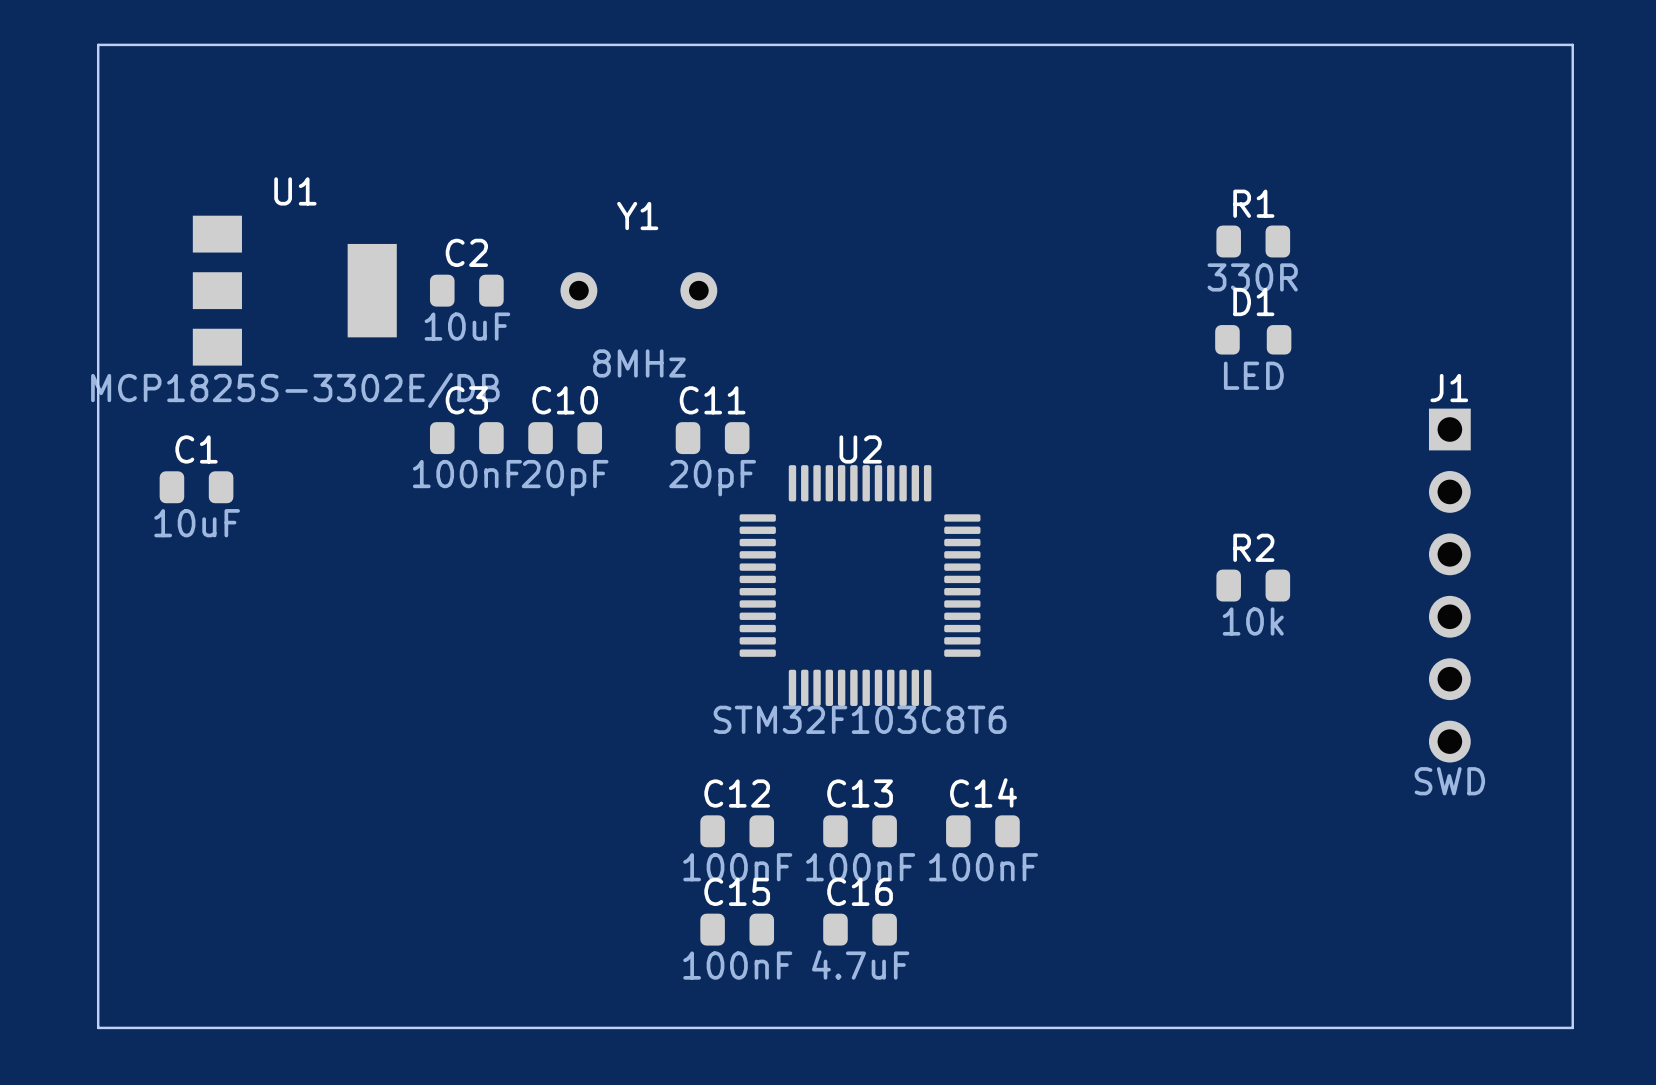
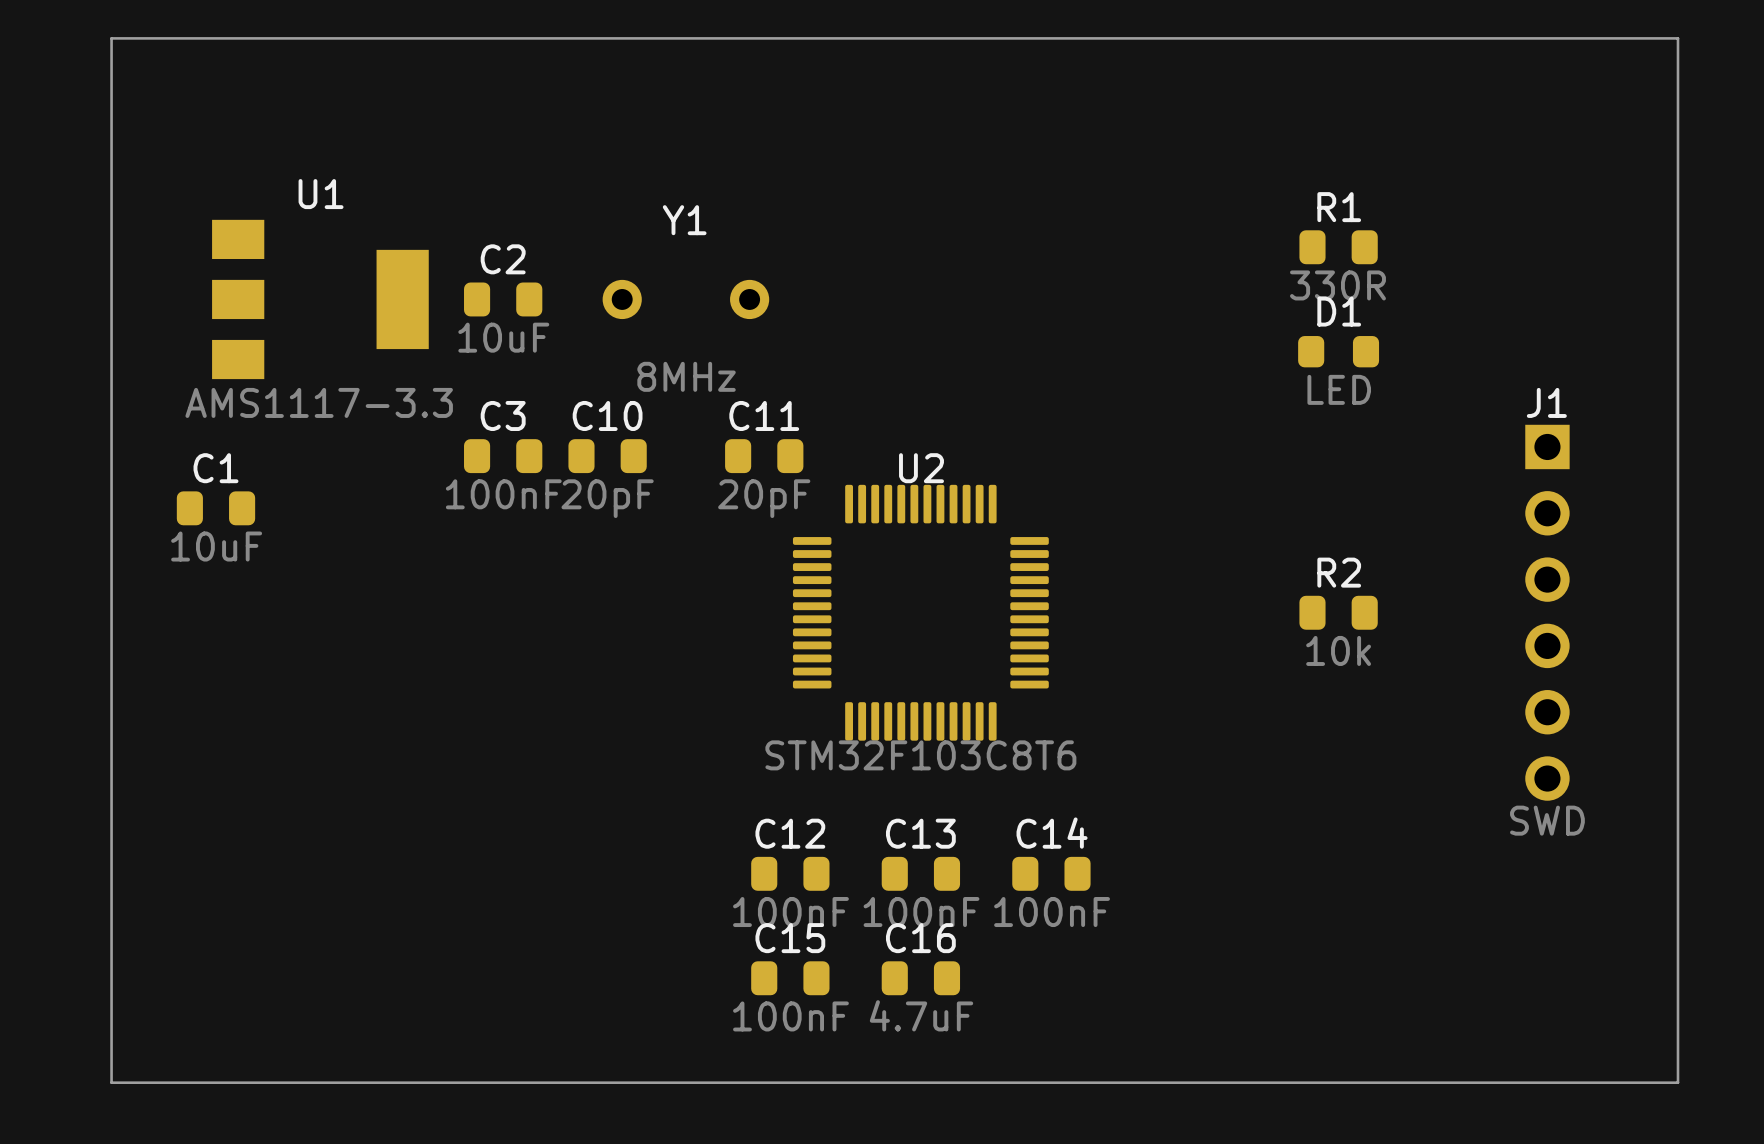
U1 value: MCP1825S-3302E/DB (295, 390) -> AMS1117-3.3 (319, 402)

